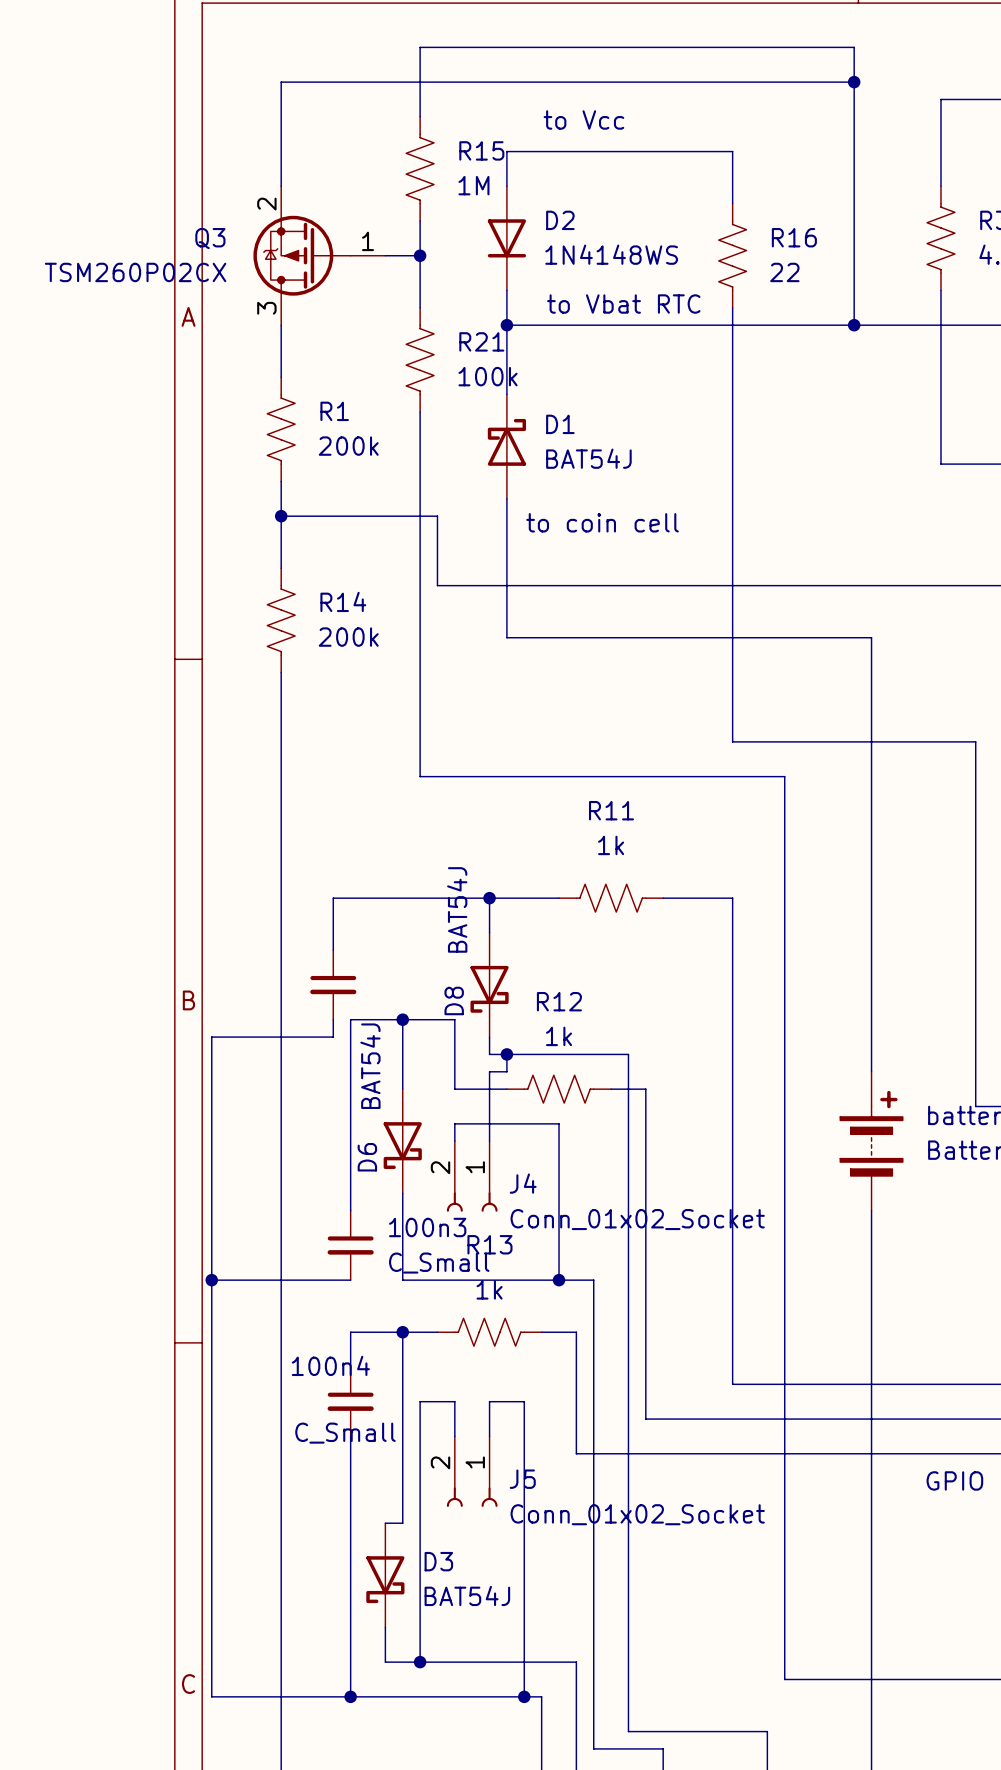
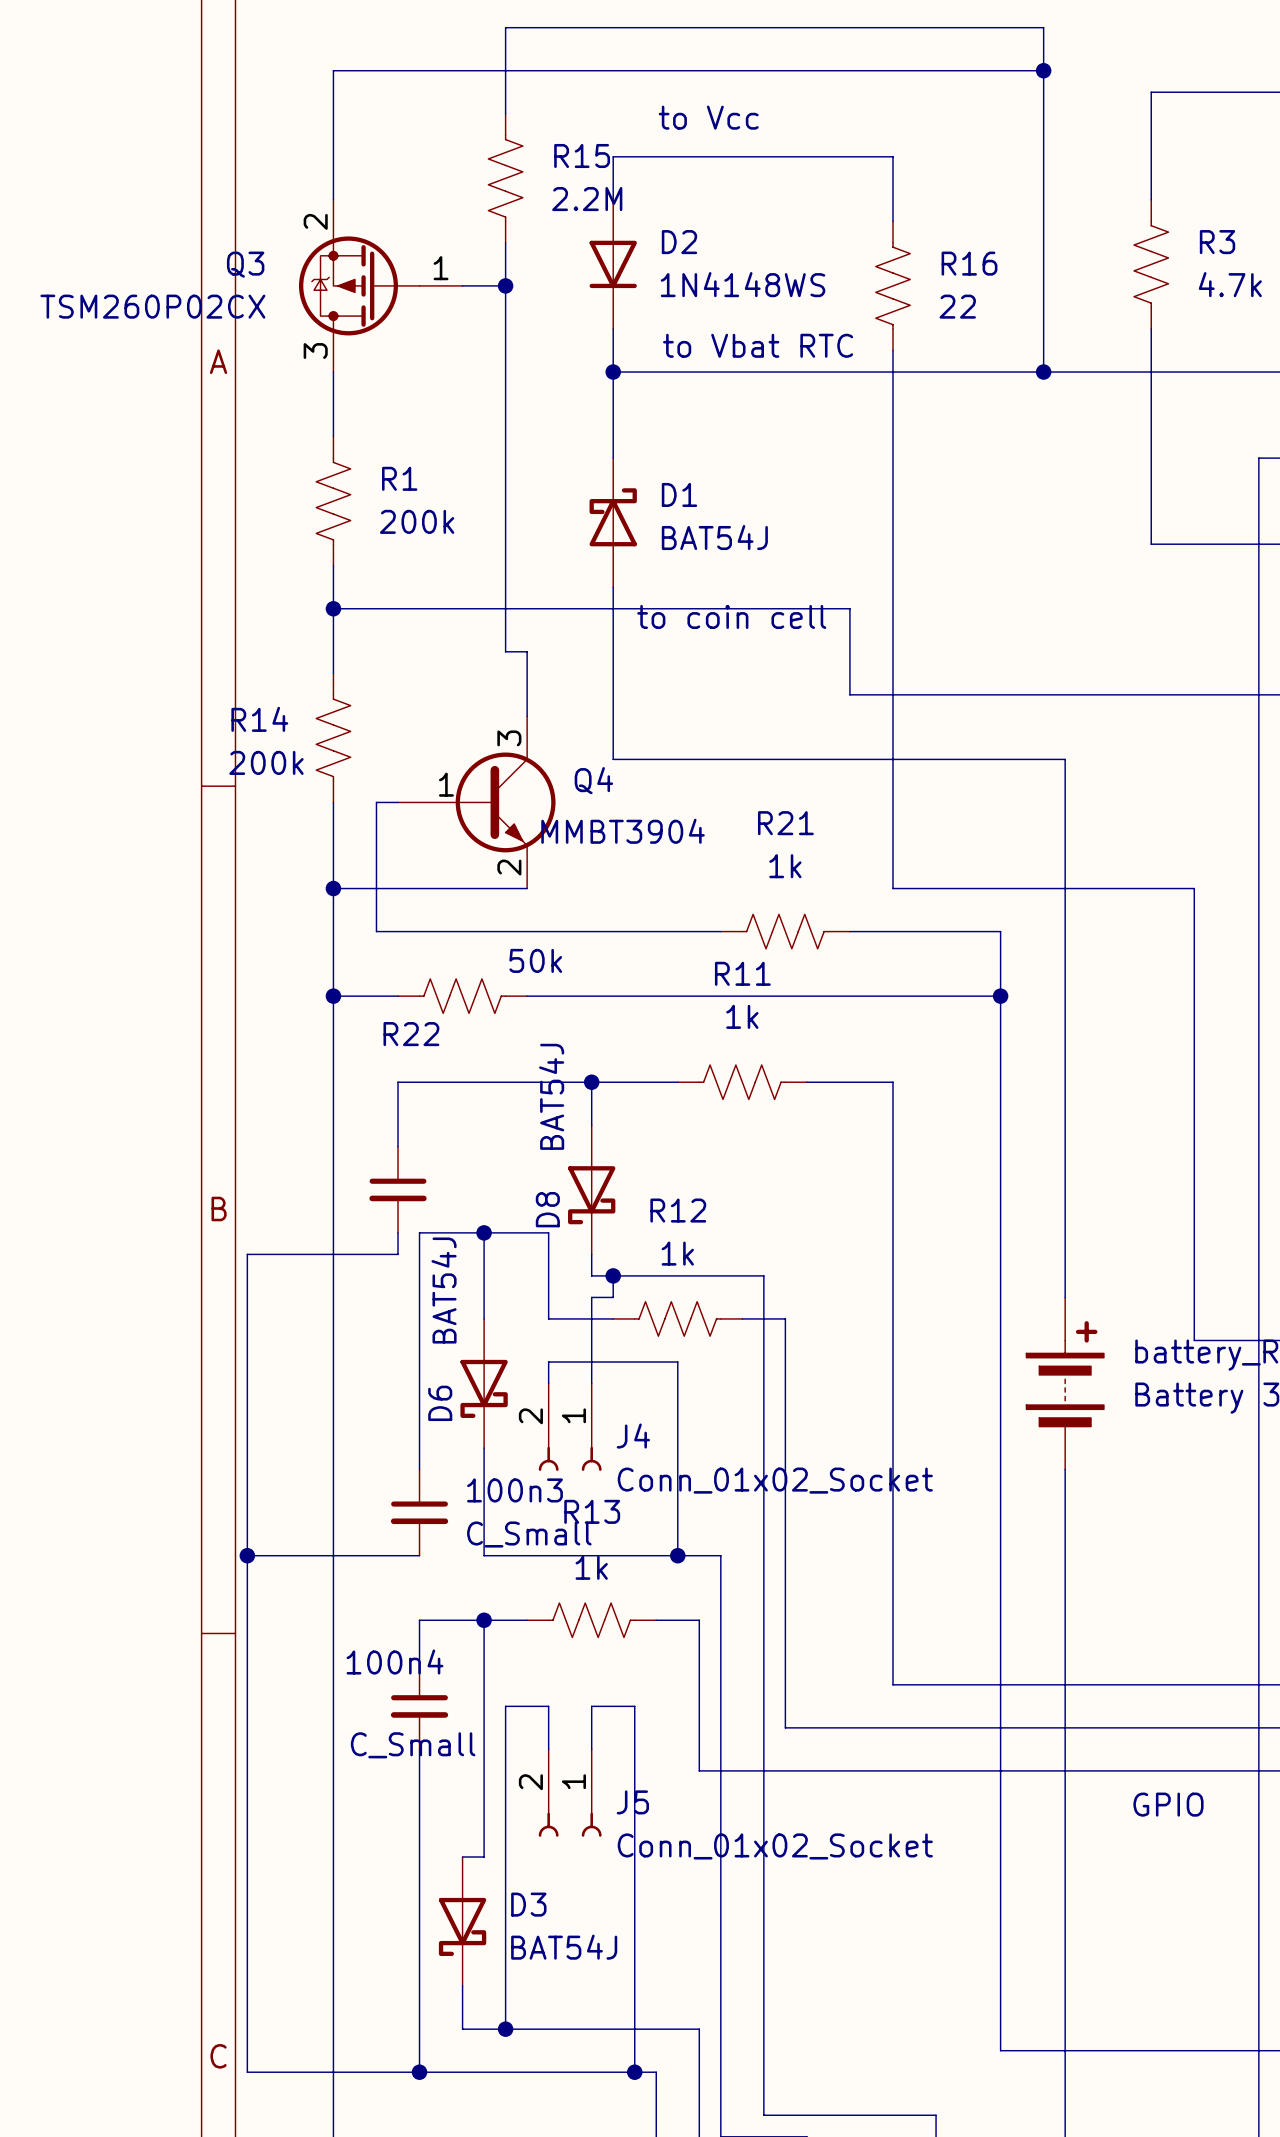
R15 value: 1M (473, 185) -> 2.2M (587, 199)
wire: none -> (505, 350) (505, 479)
R21 name position: R21 (481, 341) -> R21 (785, 823)
R21 rotation: 0° (420, 359) -> 90° clockwise (785, 931)
R21 position: (420, 359) -> (785, 931)
R21 value: 100k (488, 376) -> 1k (785, 866)
wire: (437, 516) (437, 550) -> (505, 651) (527, 651)
wire: (420, 550) (420, 776) -> (398, 802) (376, 802) (376, 931) (505, 931)
wire: (437, 585) (697, 585) -> (527, 608) (849, 608) (849, 694)
wire: none -> (527, 694) (527, 716)
R14 name position: R14 (343, 601) -> R14 (259, 719)
R14 value position: 200k (348, 637) -> 200k (266, 762)
Q4: none -> MMBT3904 (476, 802)
wire: none -> (333, 888) (527, 888)
junction: none -> (333, 888)
wire: (593, 776) (697, 776) -> none
wire: (784, 776) (784, 1679) (819, 1679) -> (957, 931) (1000, 931) (1000, 2050)
wire: none -> (333, 996) (398, 996)
junction: none -> (333, 996)
R22: none -> 50k (462, 996)
wire: none -> (527, 996) (1000, 996)
junction: none -> (1000, 996)

